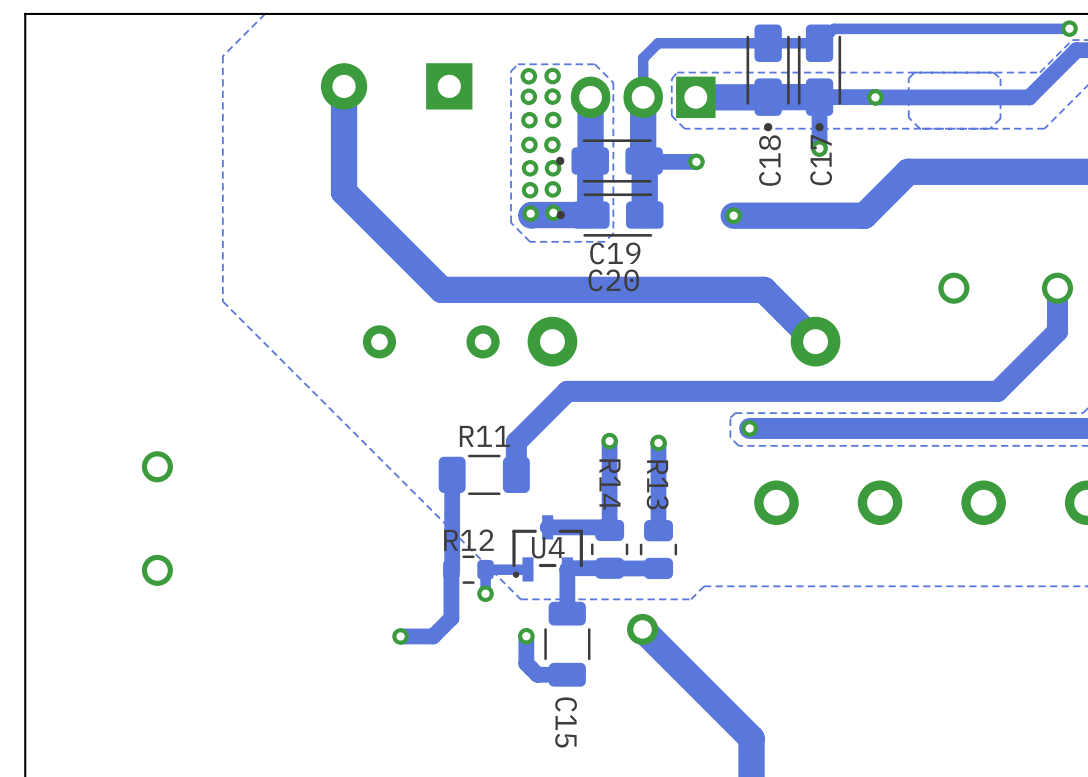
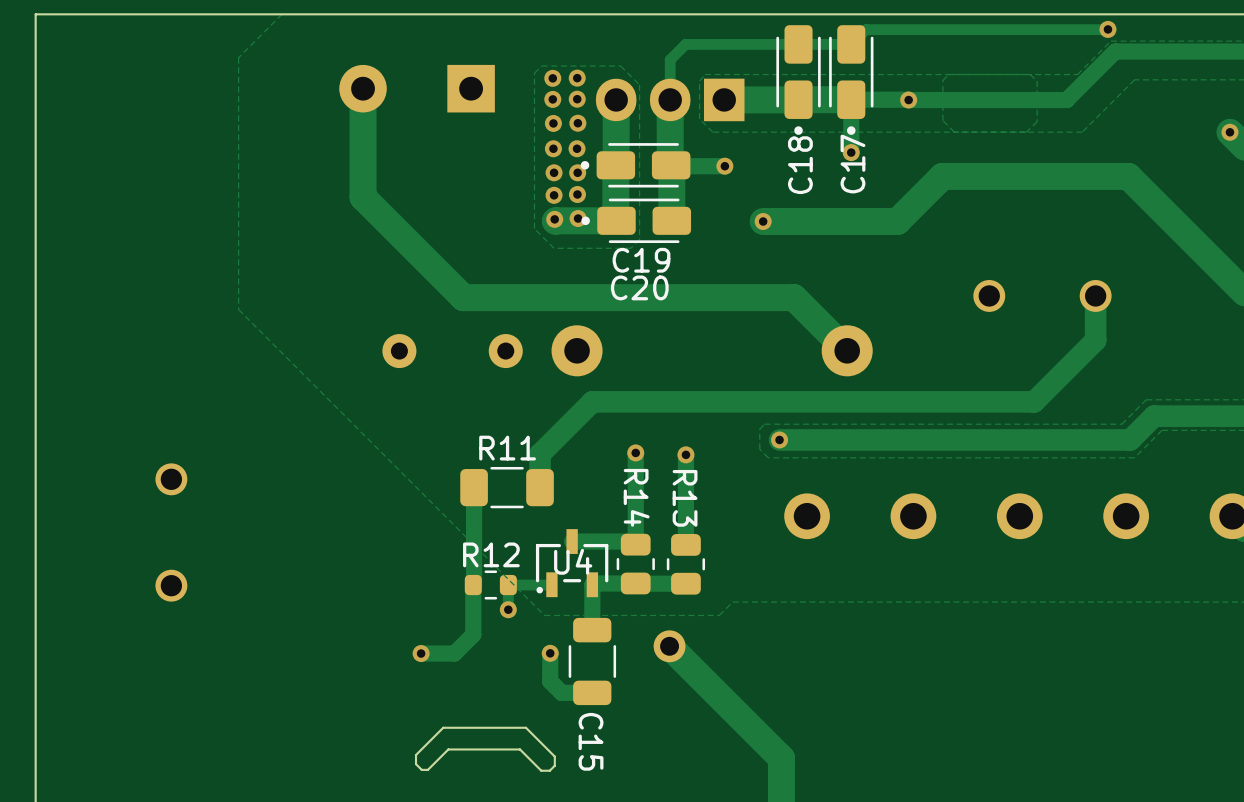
board edge: none -> (554, 765) (554, 756) (525, 727) (443, 727) (416, 755) (416, 764) (421, 769) (427, 769) (448, 749) (520, 749) (541, 770) (549, 770) (554, 765)

